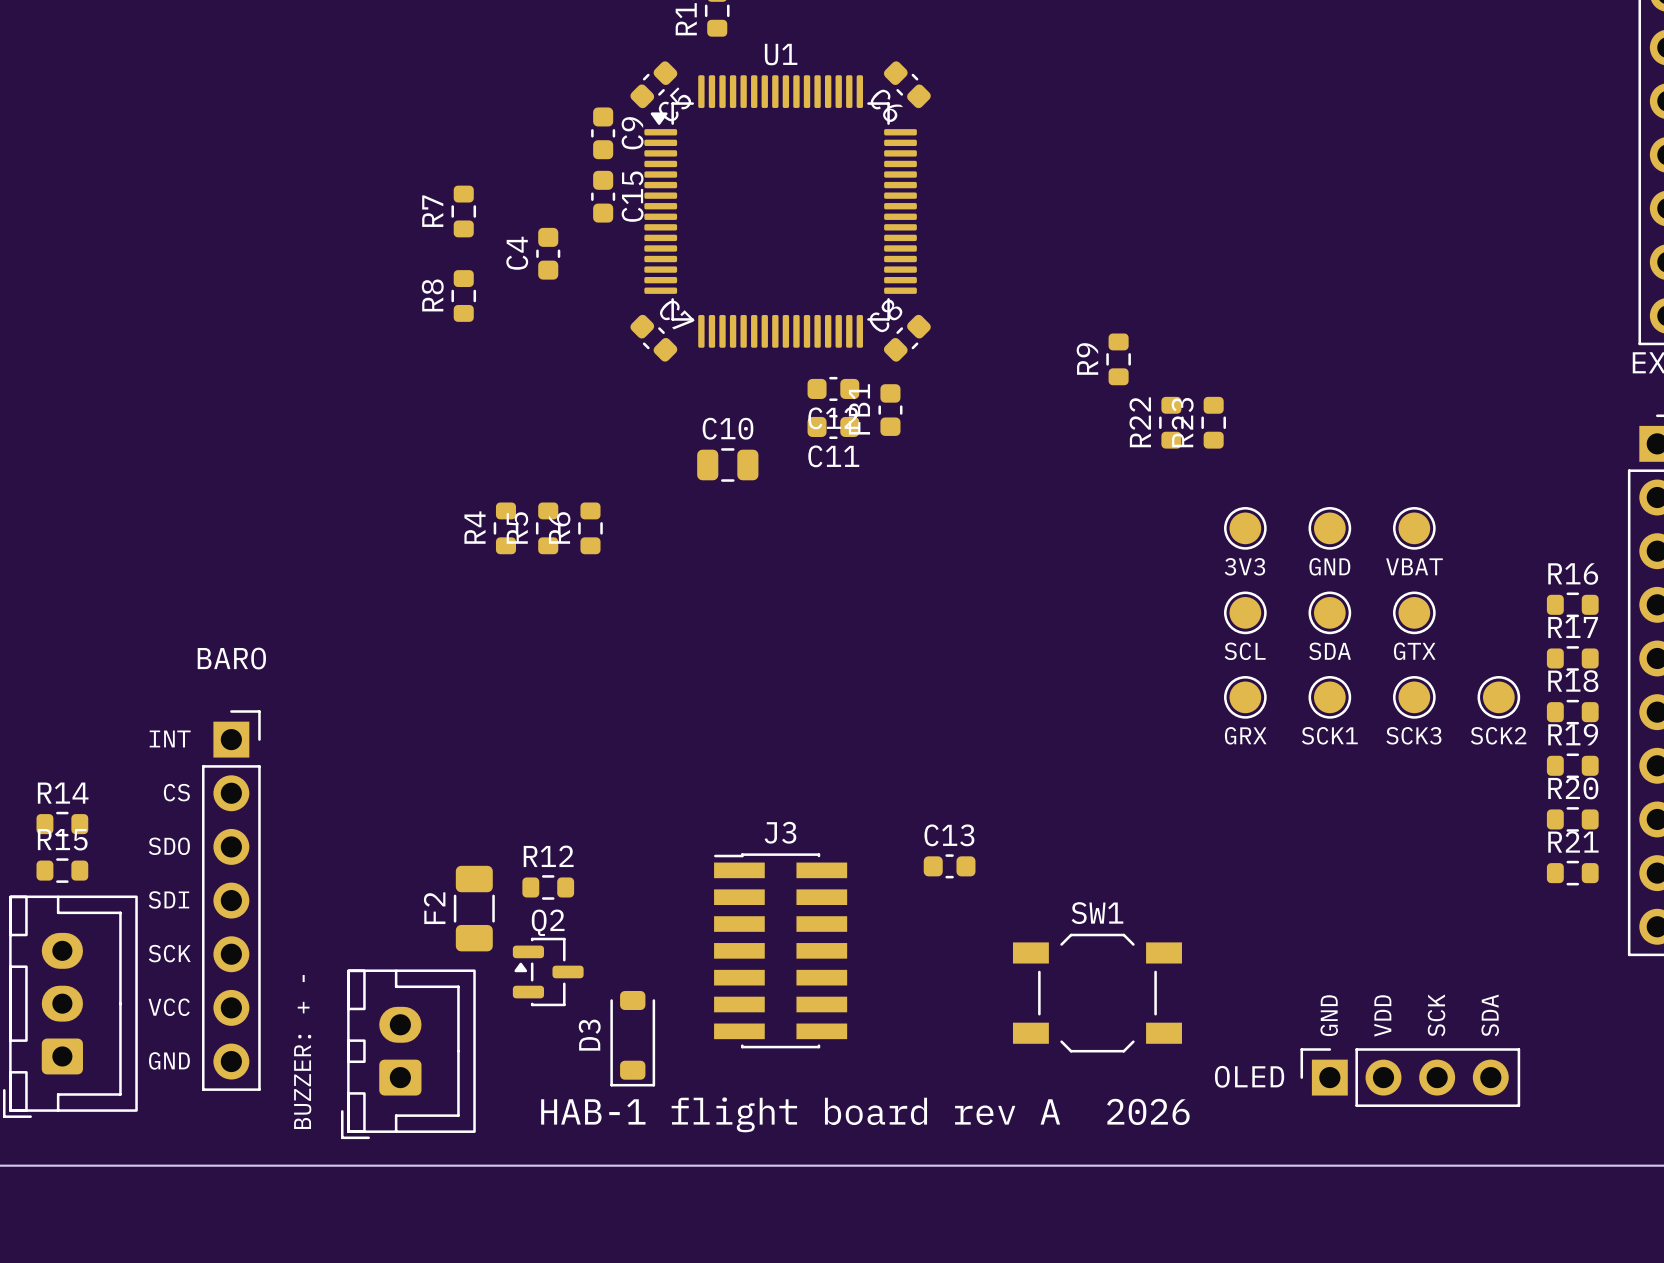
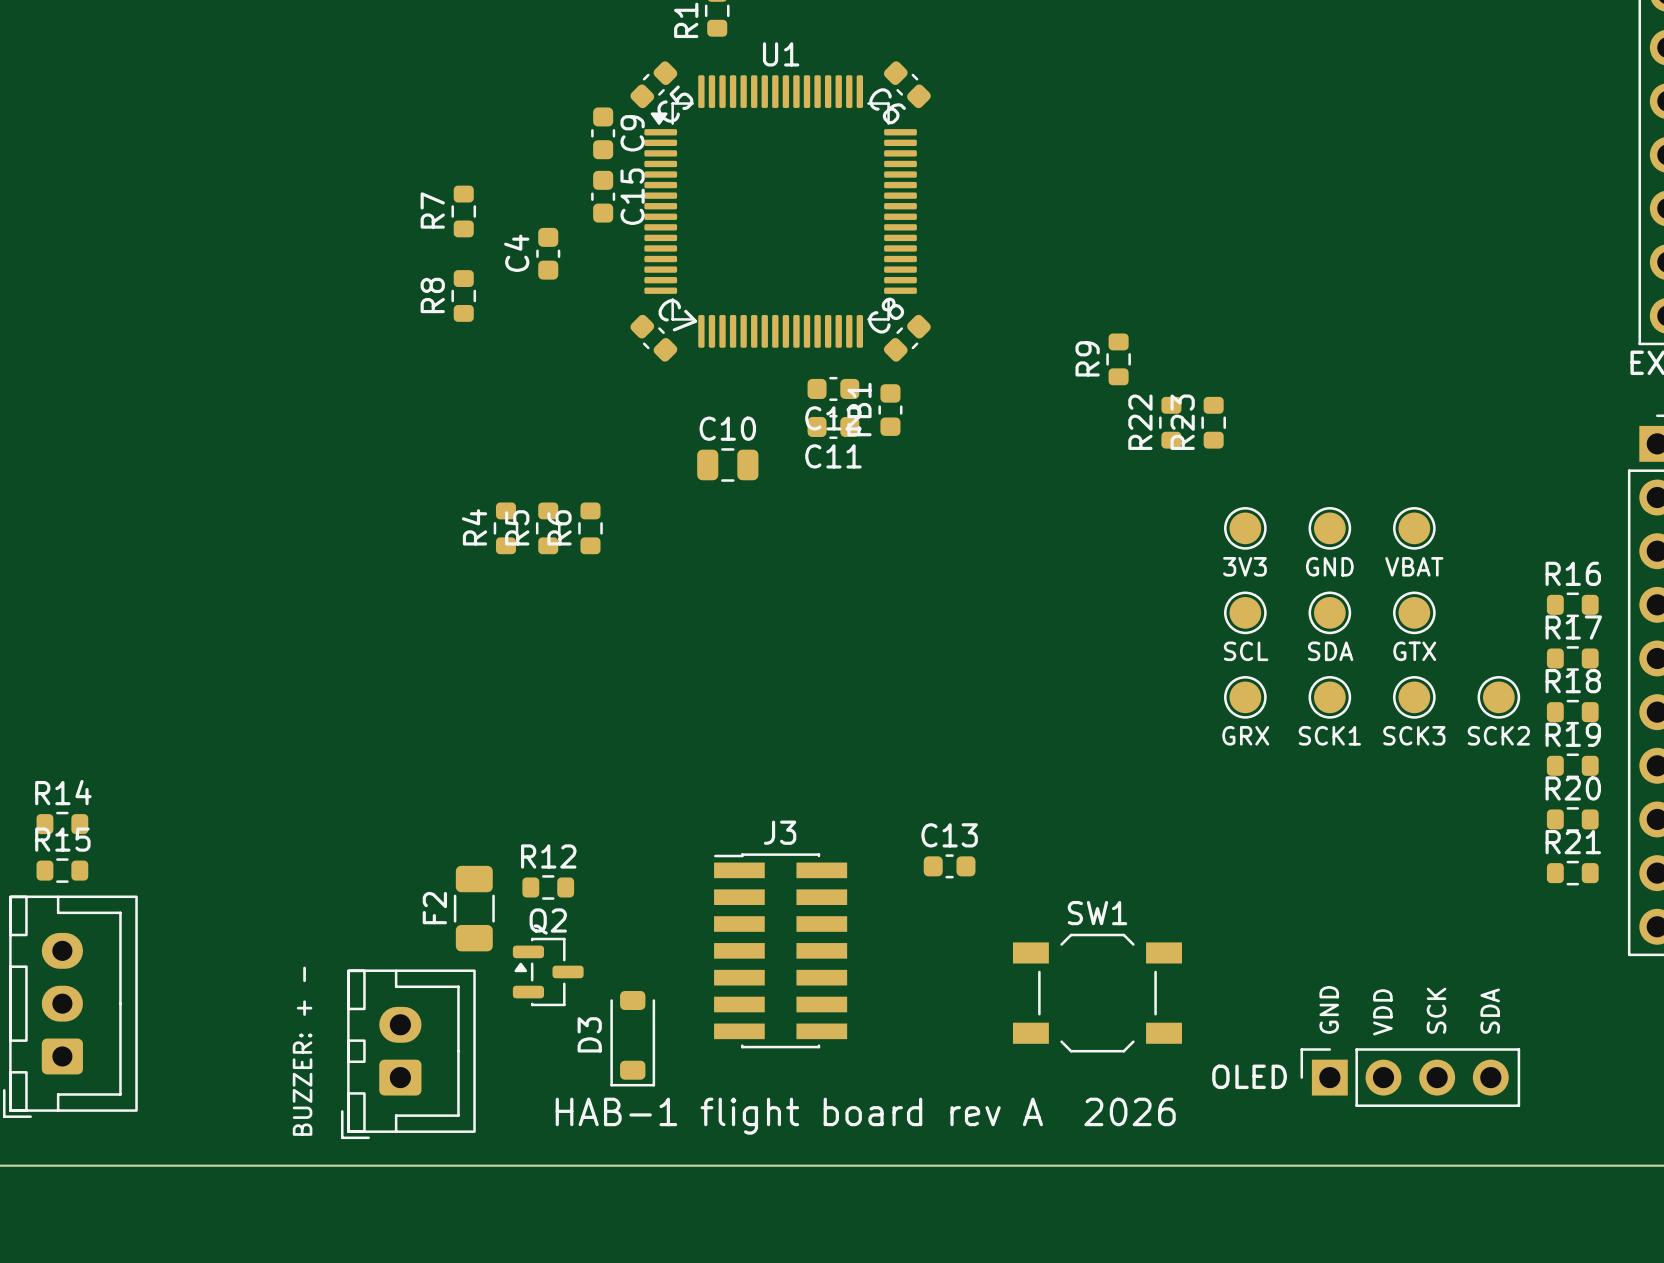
text: BARO (231, 658) -> none
text: INT (170, 738) -> none
text: CS (176, 792) -> none
text: SDO (169, 846) -> none
text: SDI (168, 899) -> none
part: (231, 900) -> none
text: SCK (169, 953) -> none
text: VCC (169, 1007) -> none
text: GND (169, 1060) -> none

